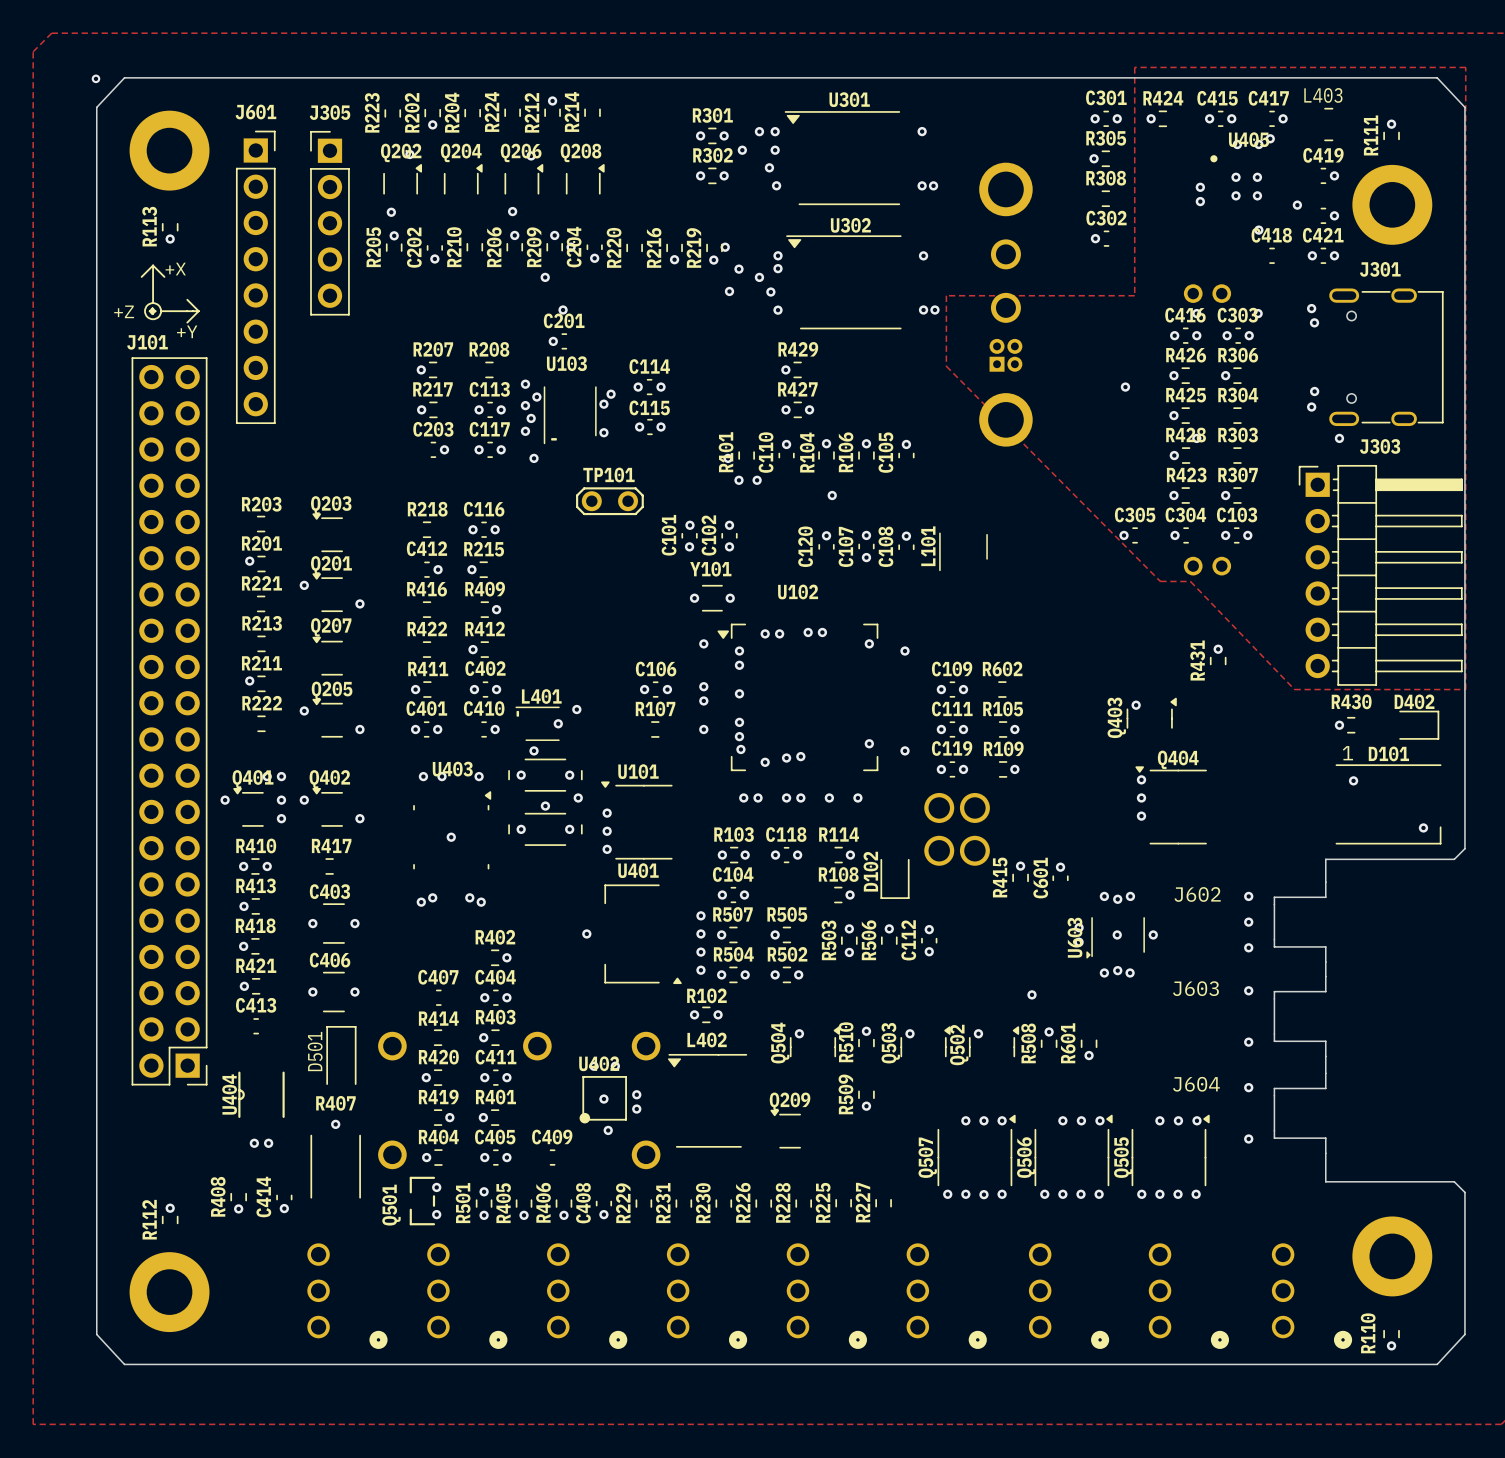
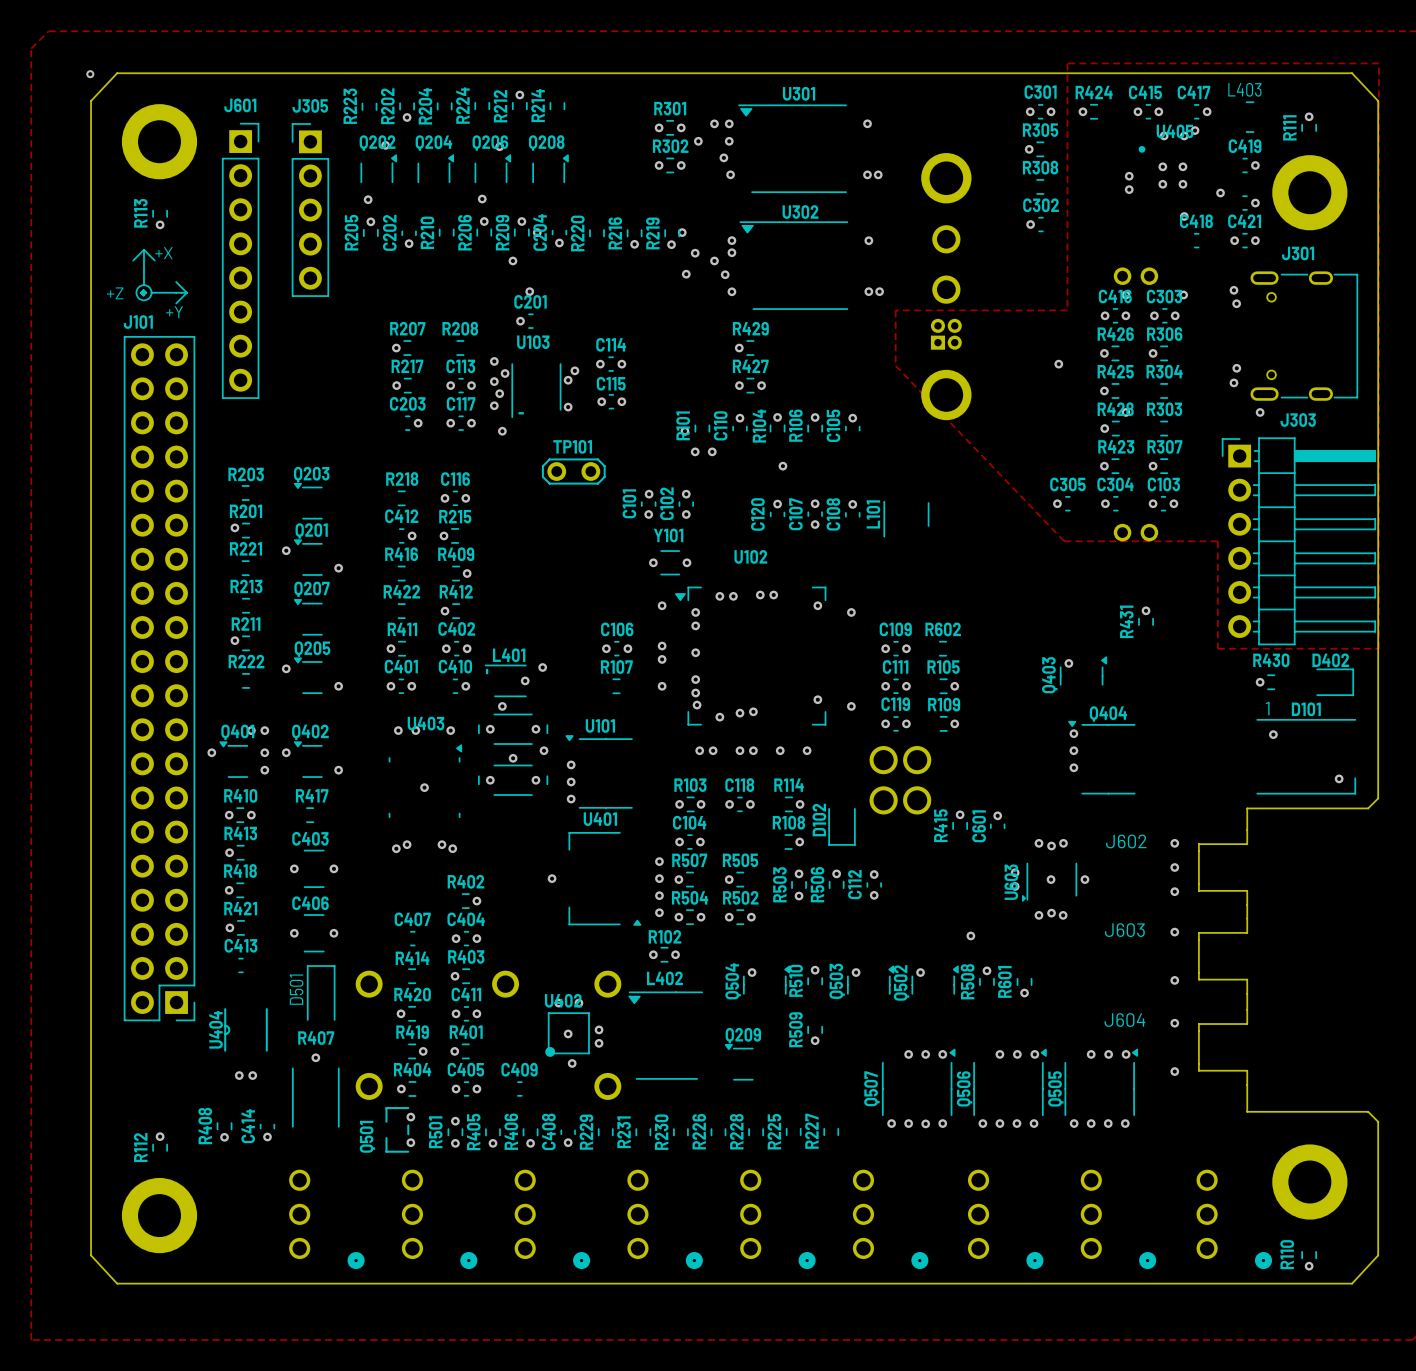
zone outline: (1134, 295) (946, 295) (946, 366) (1160, 581) (1190, 581) (1294, 689) -> (1067, 278) (1067, 310) (895, 310) (895, 365) (1064, 541) (1217, 541) (1217, 648)

